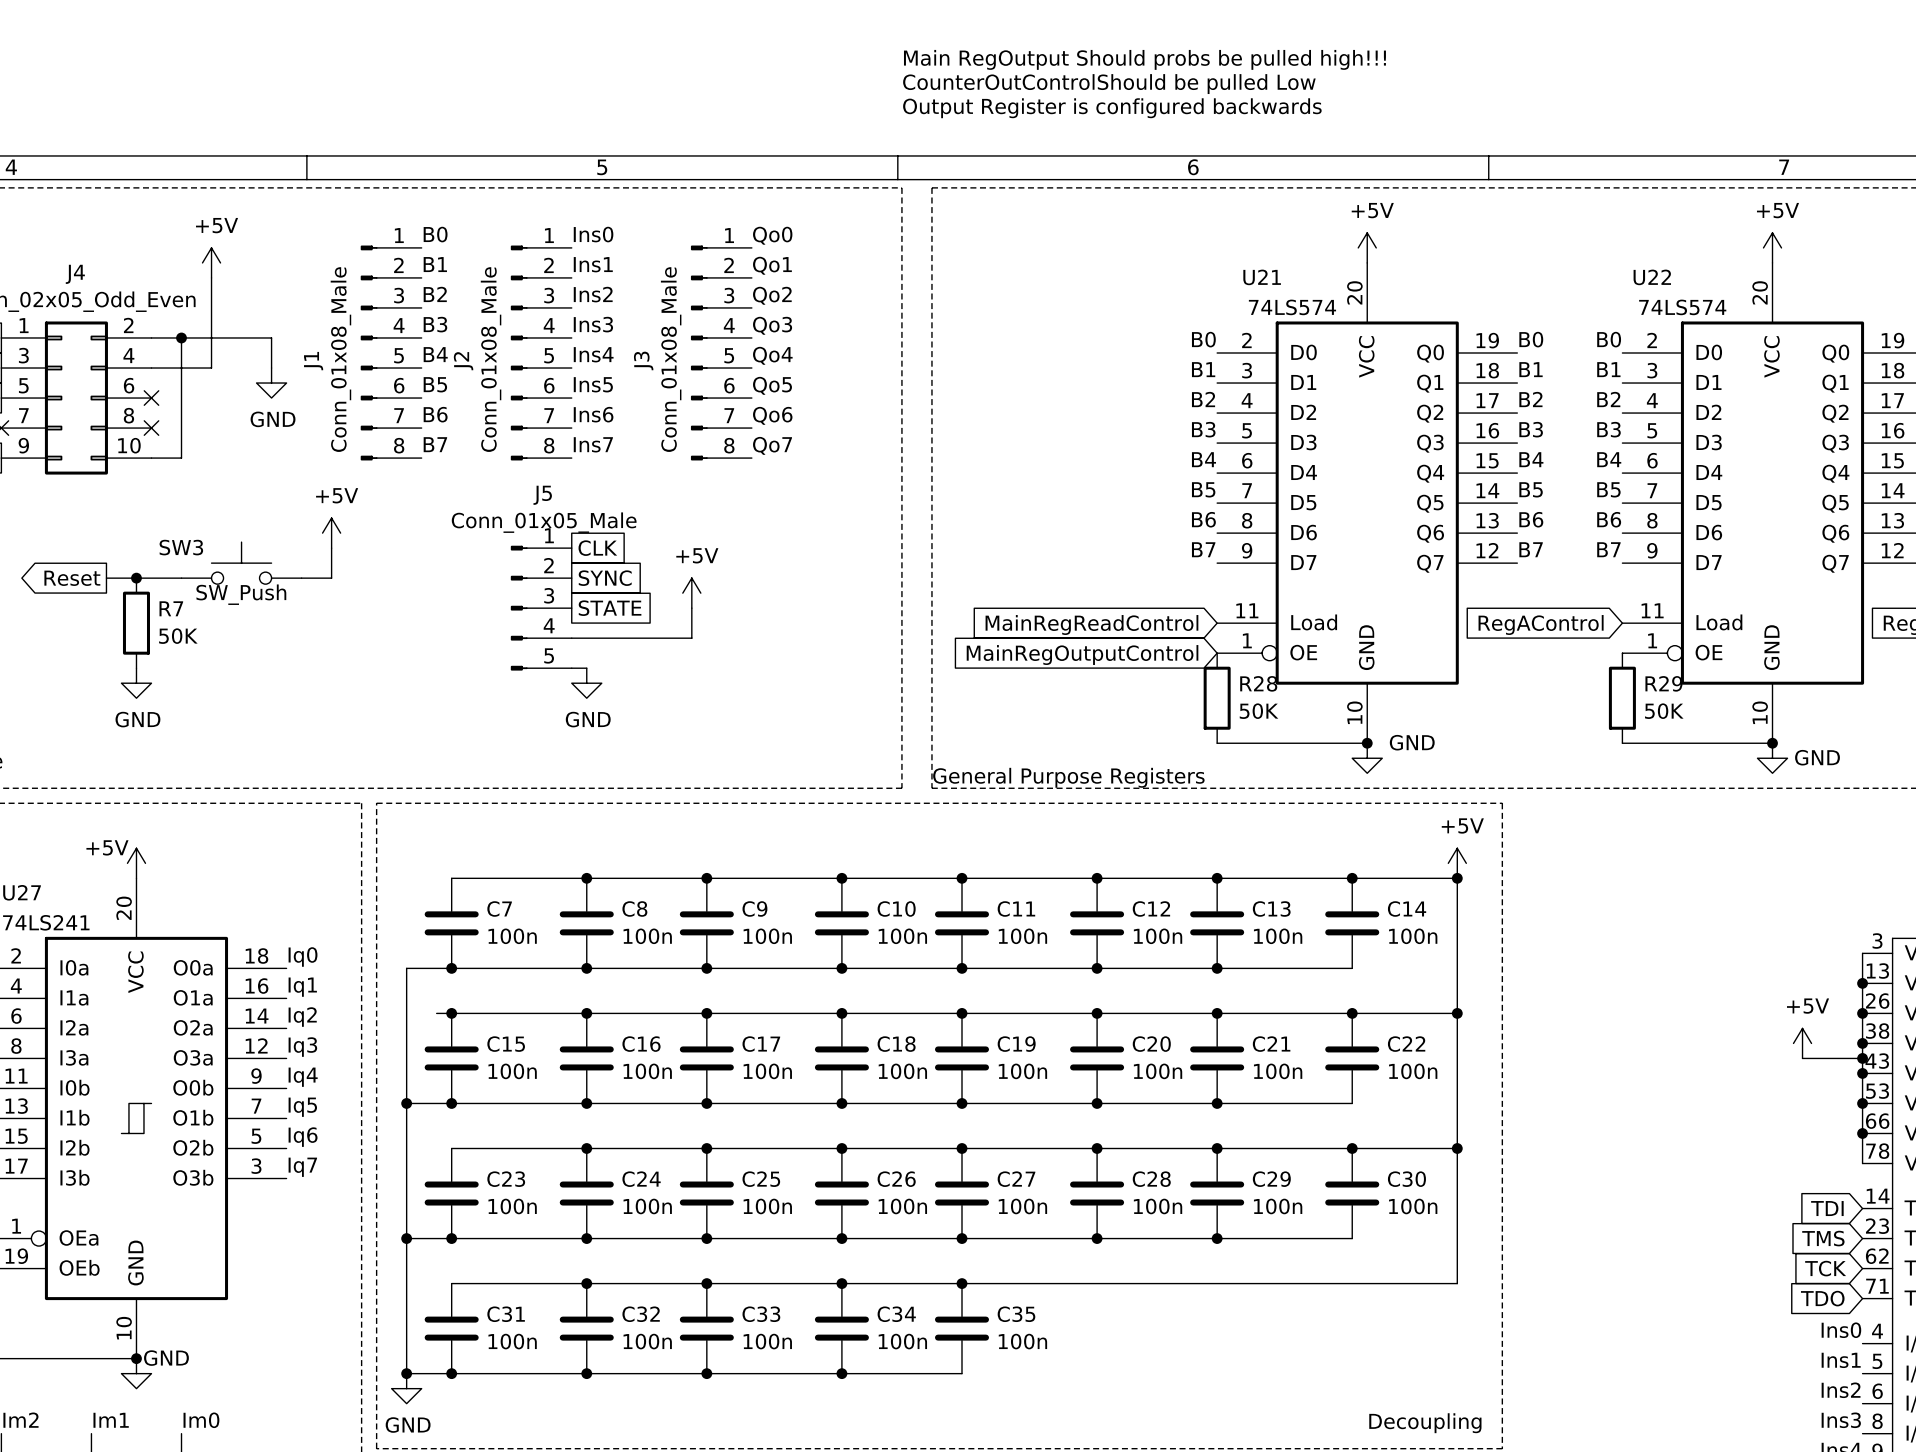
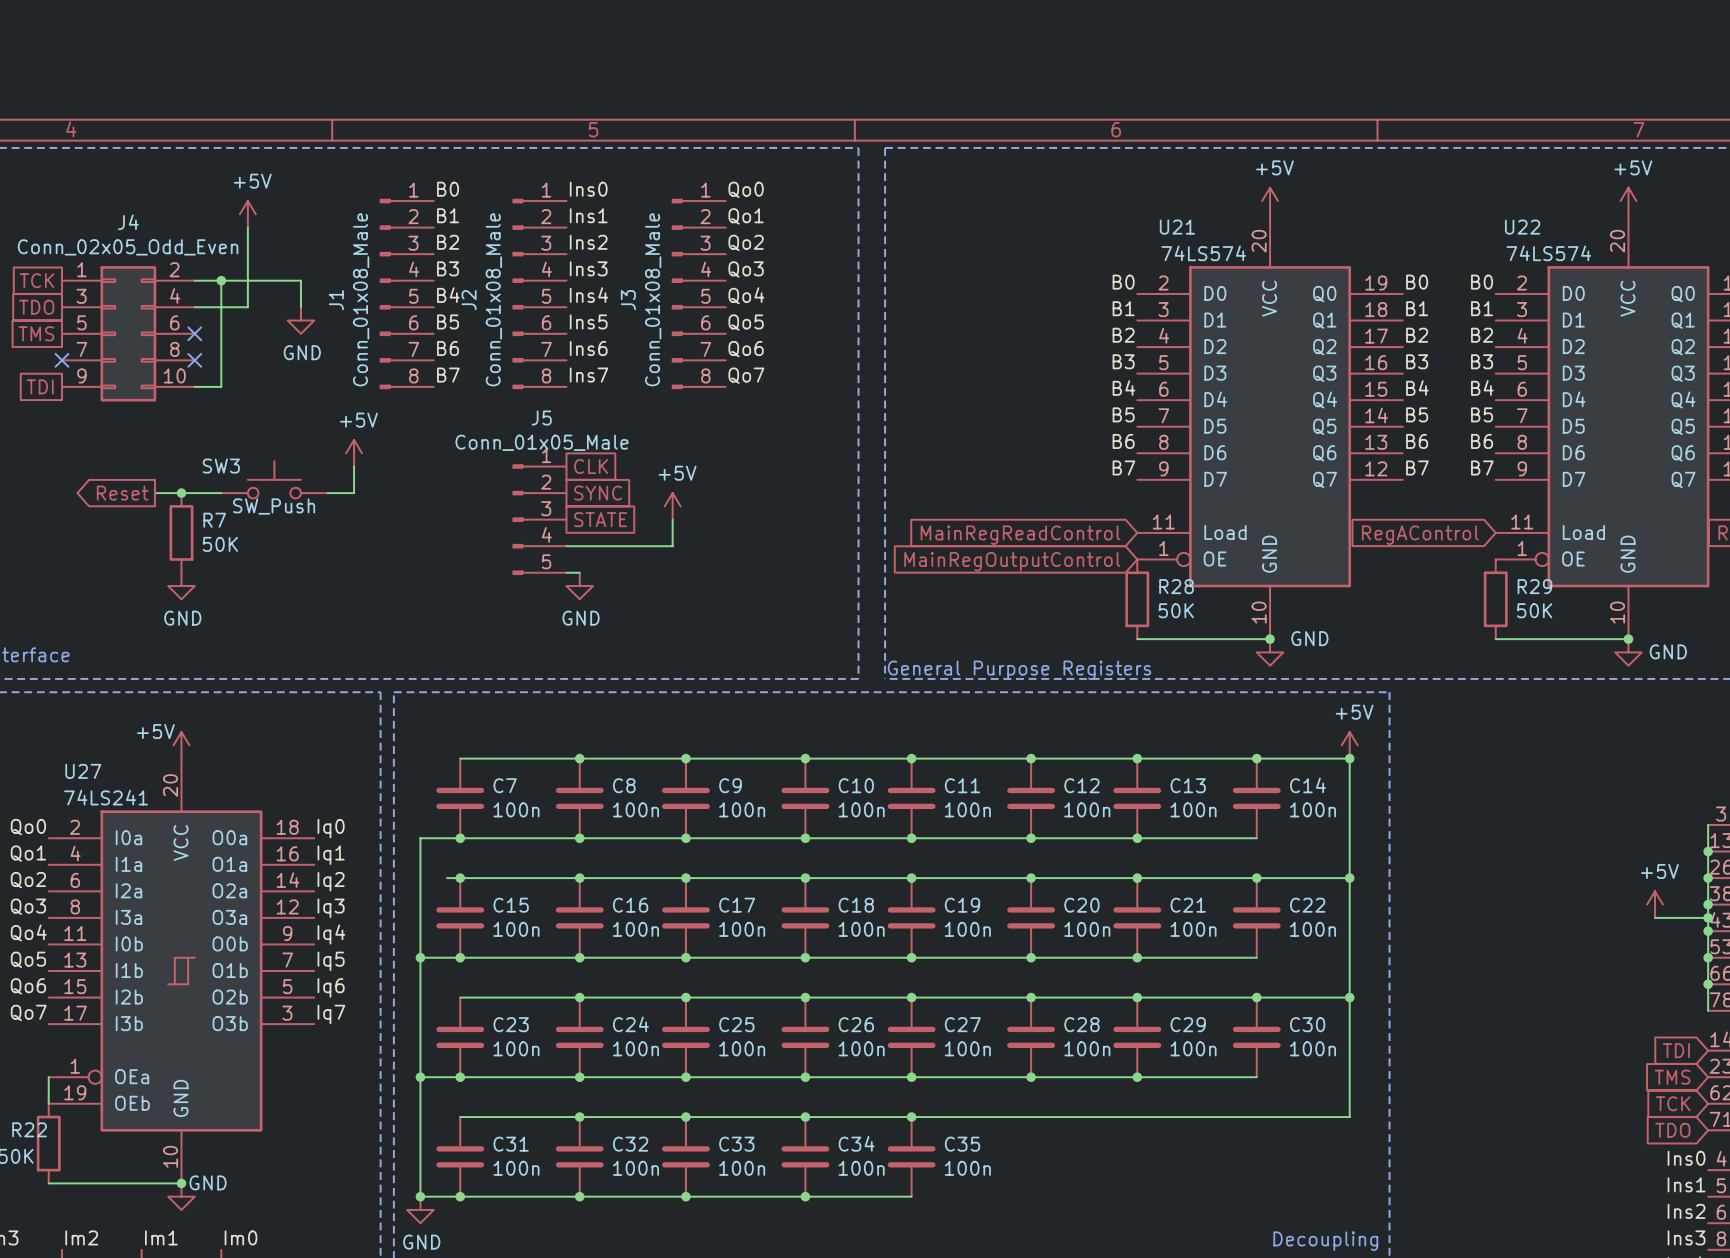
text: Main RegOutput Should probs be pulled high!!! (1144, 59) -> none
text: CounterOutControlShould be pulled Low (1109, 84) -> none
text: Output Register is configured backwards (1112, 108) -> none

